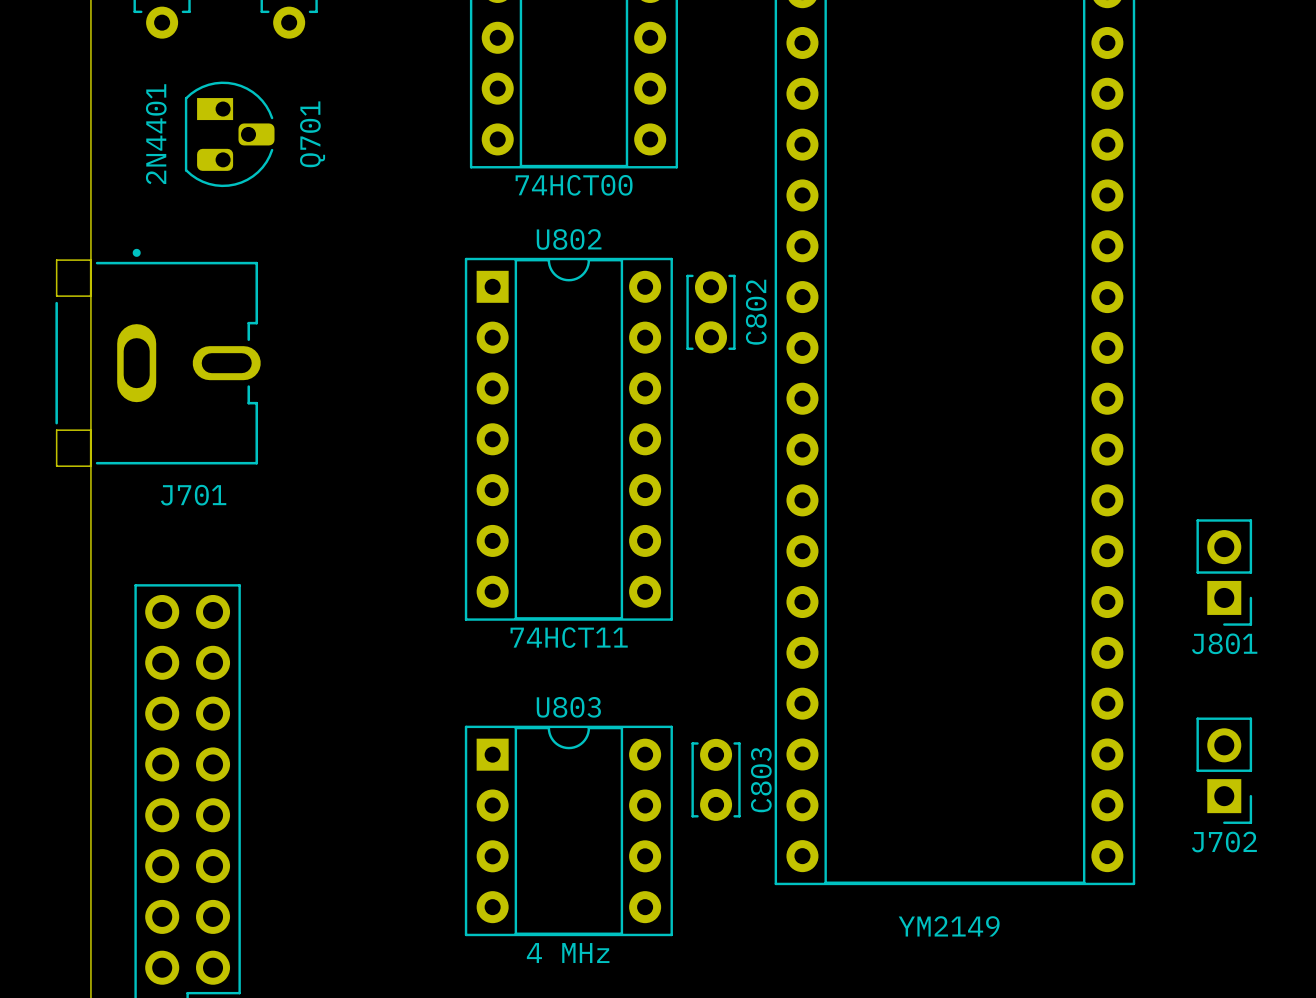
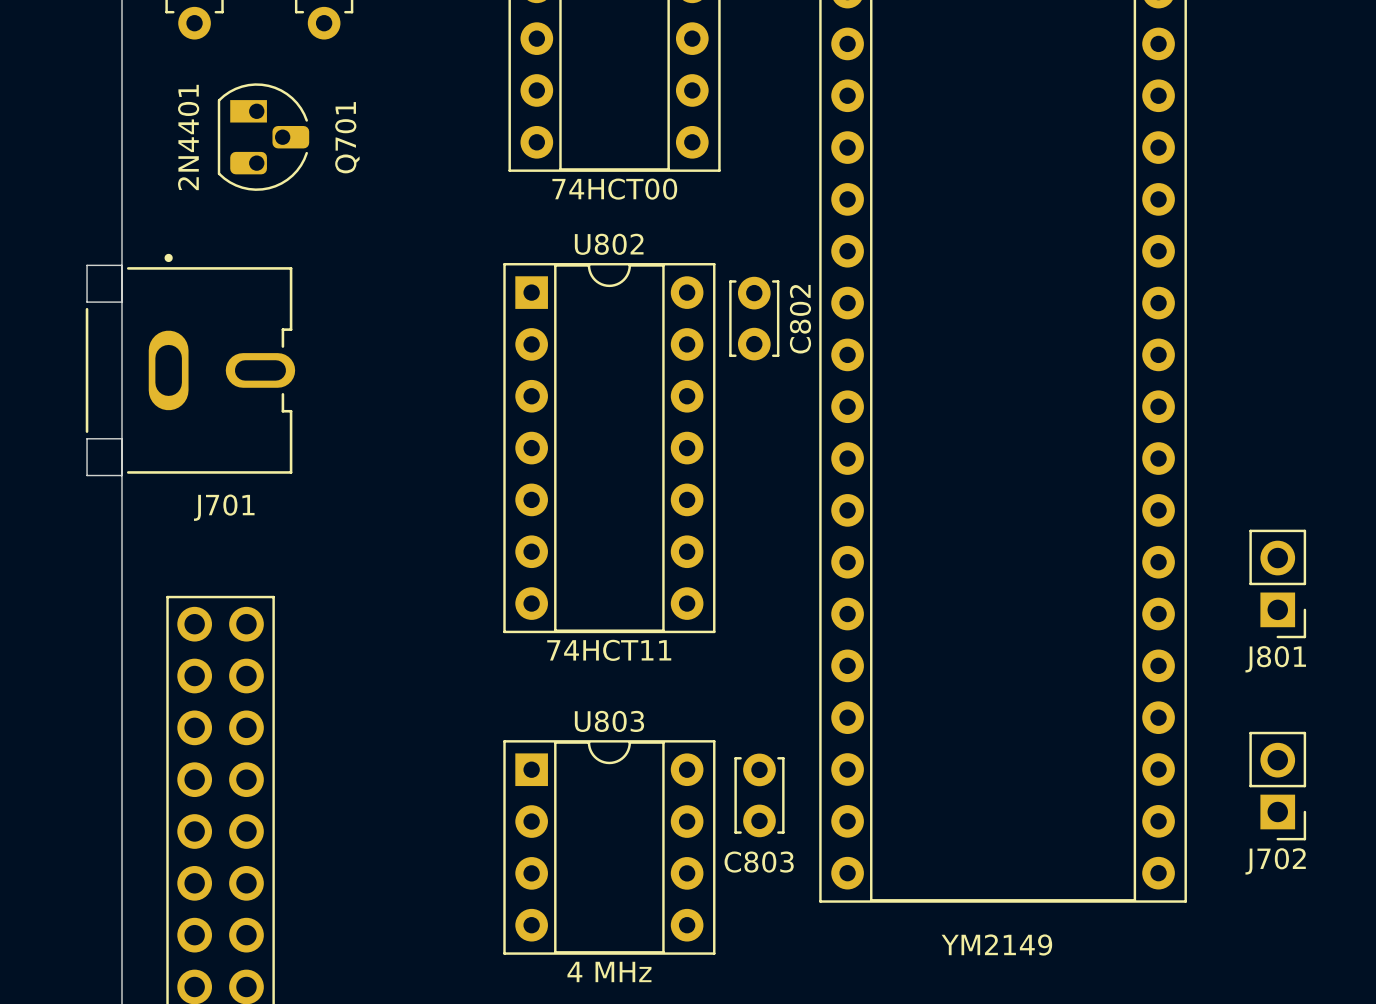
C803 name rotation: 0° (761, 780) -> 90° clockwise (759, 862)

